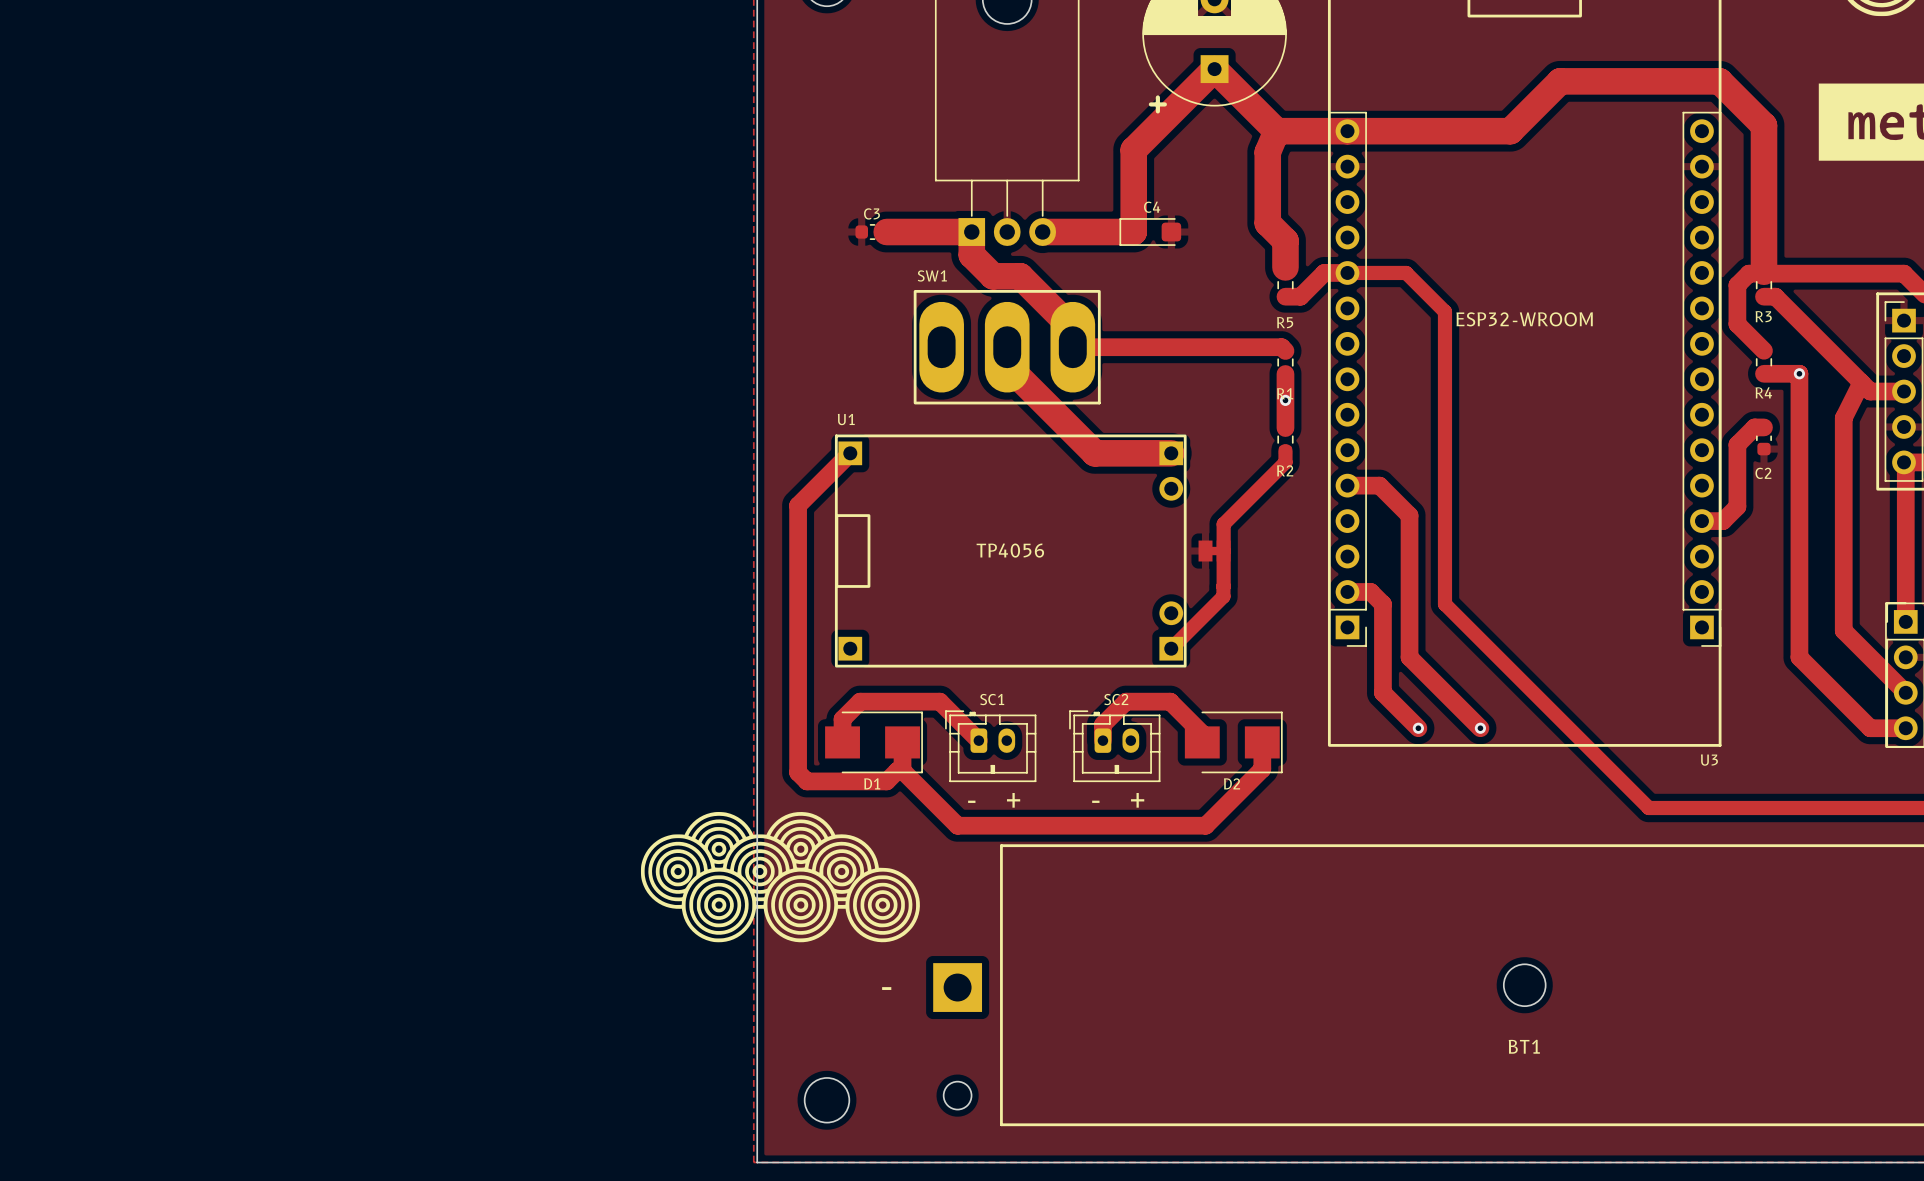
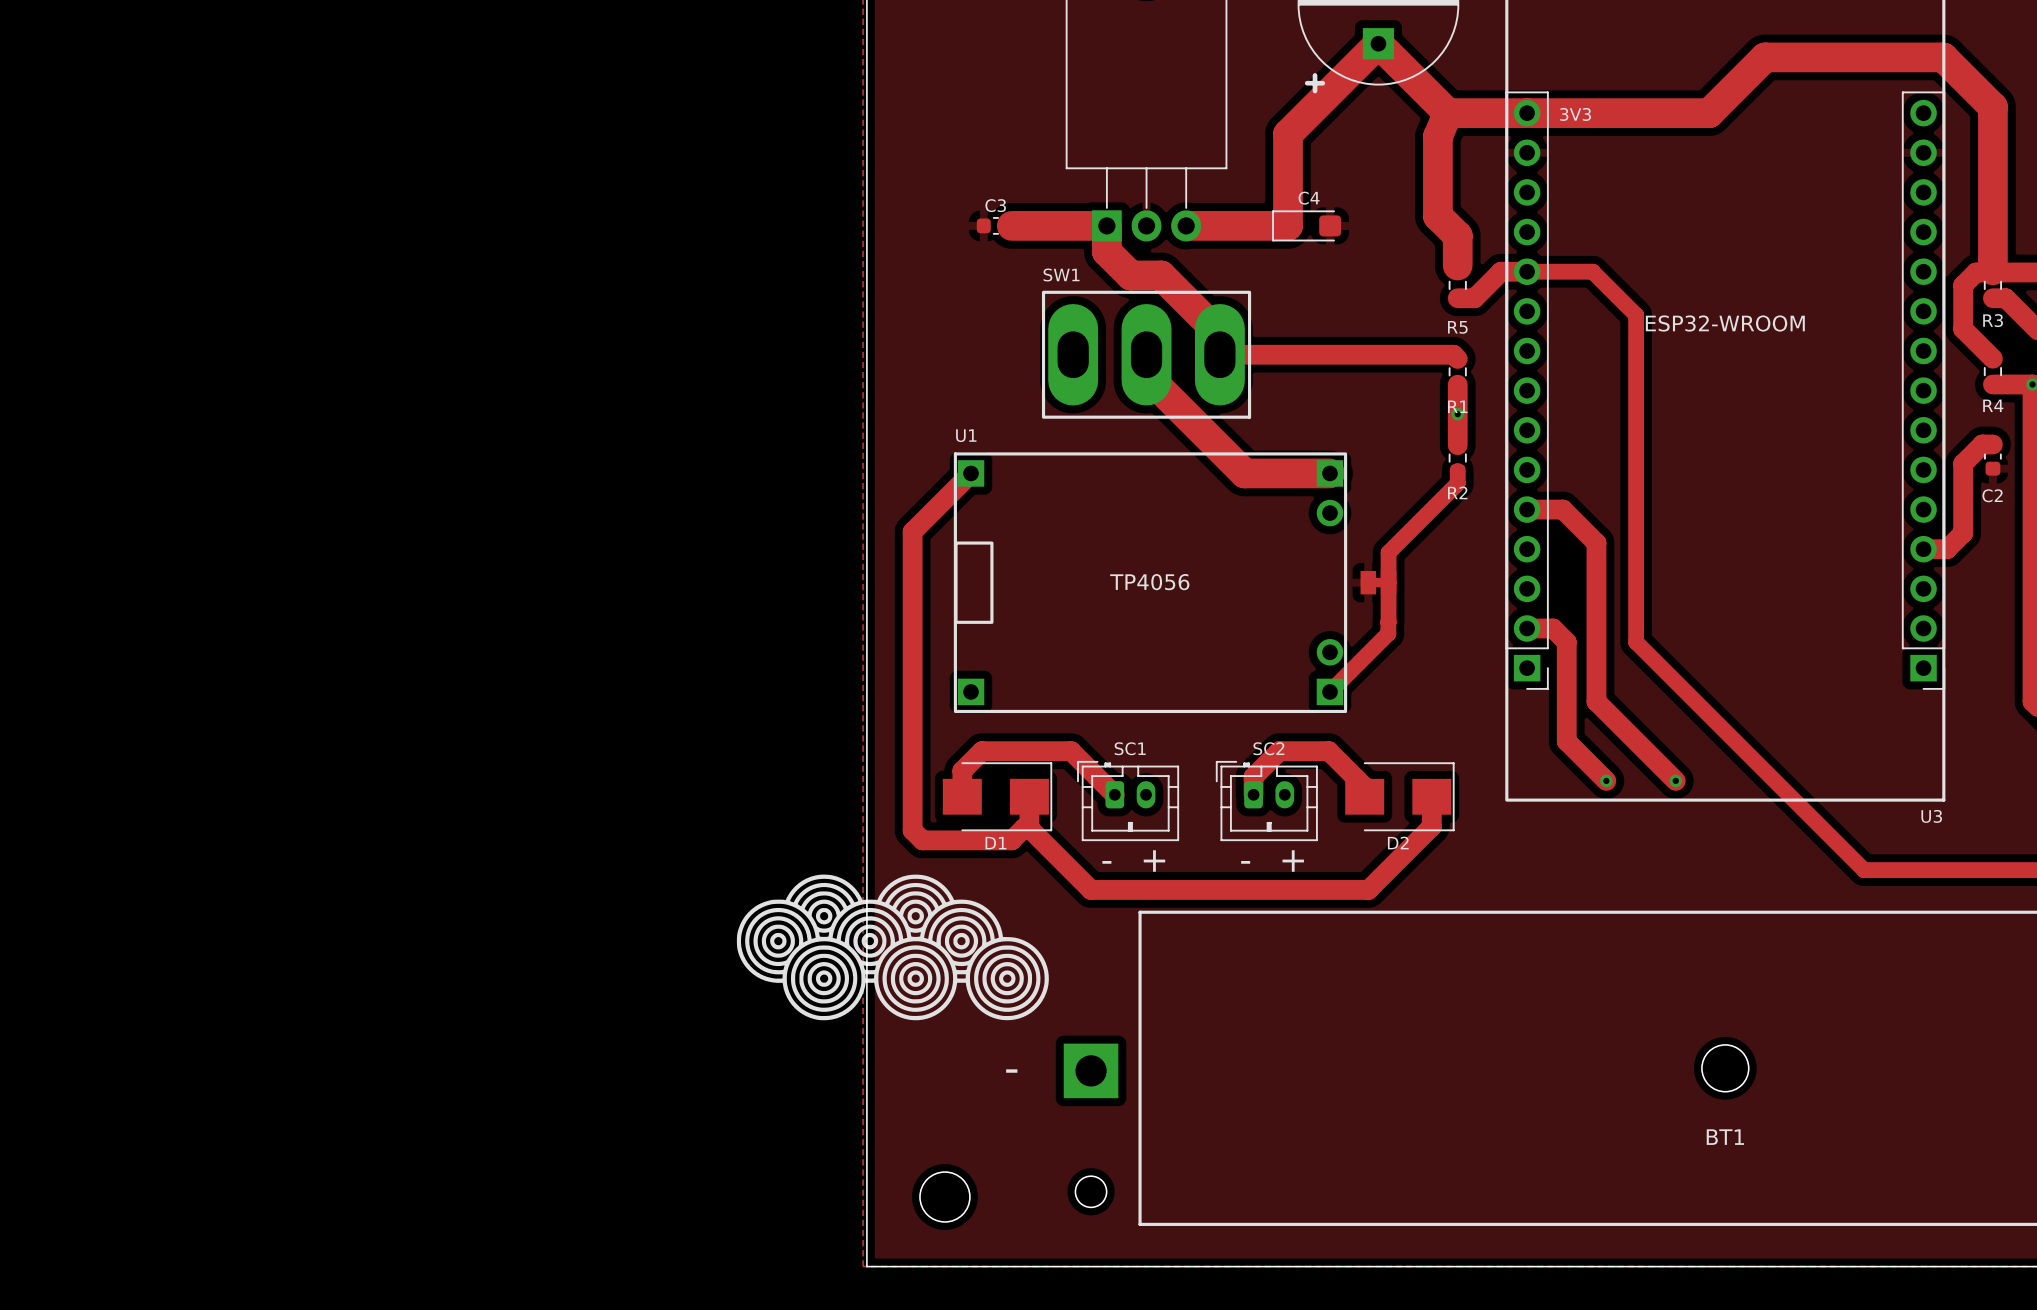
text: none -> 3V3 (1575, 114)

